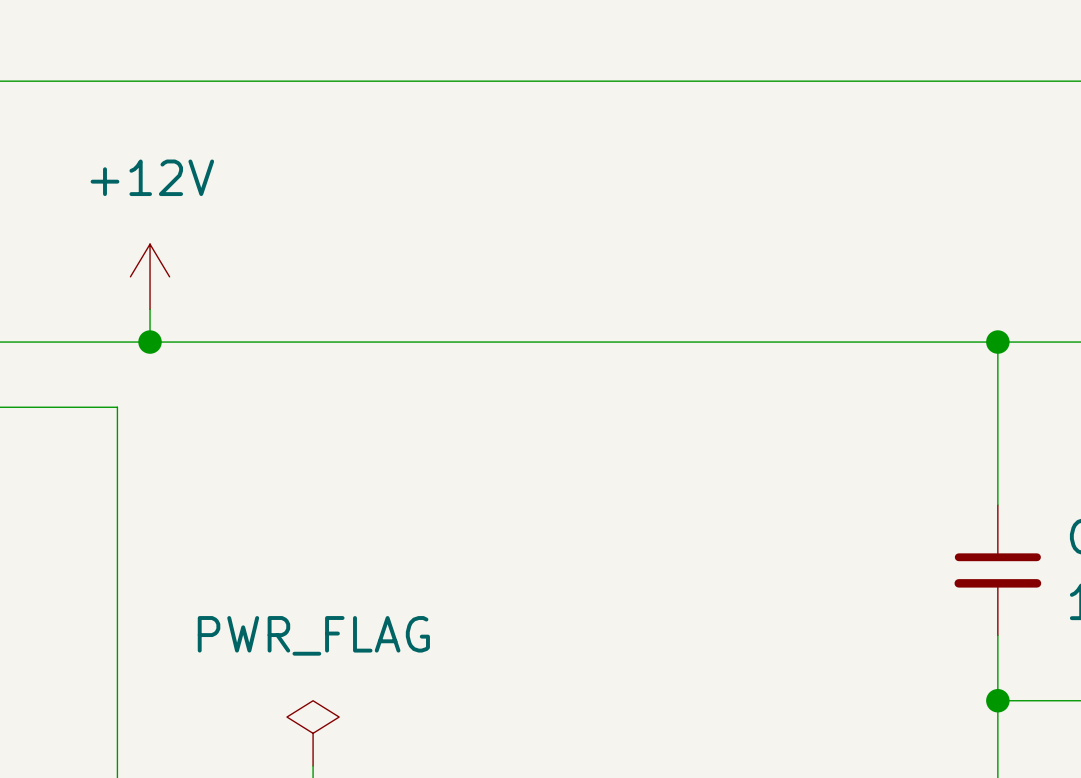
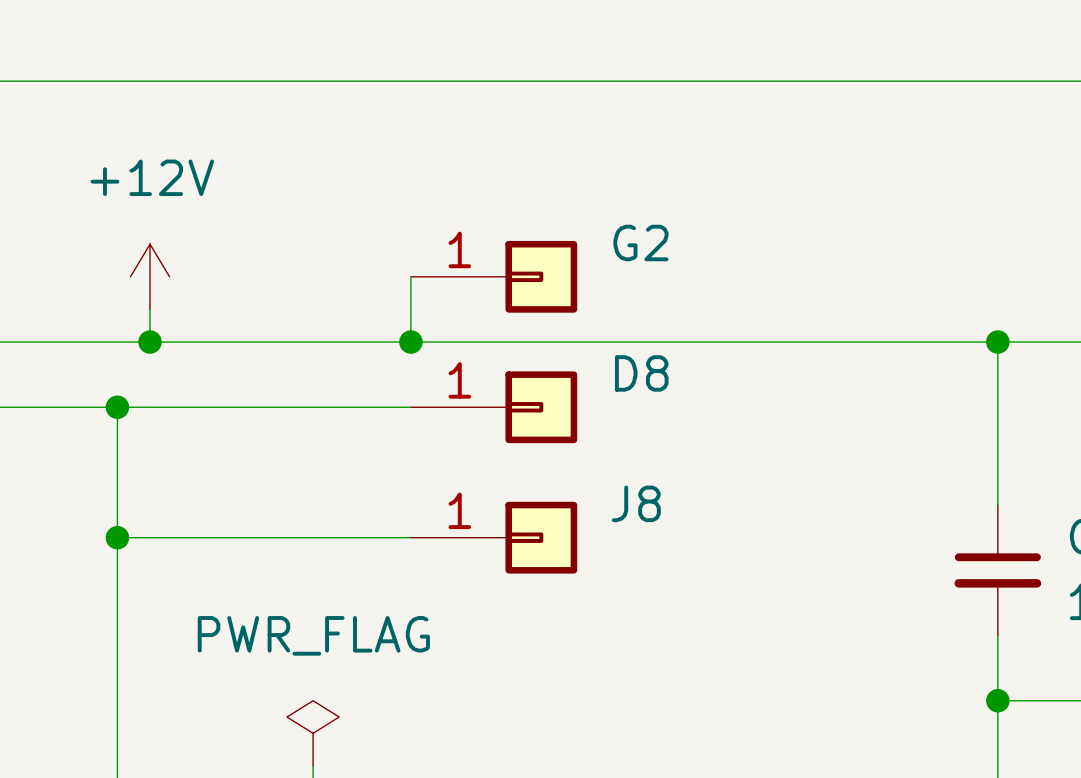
wire: none -> (410, 276) (410, 342)
G2: none -> (494, 276)
junction: none -> (410, 342)
wire: none -> (117, 407) (410, 407)
junction: none -> (117, 407)
D8: none -> (494, 407)
wire: none -> (117, 537) (410, 537)
junction: none -> (117, 537)
J8: none -> (494, 537)

